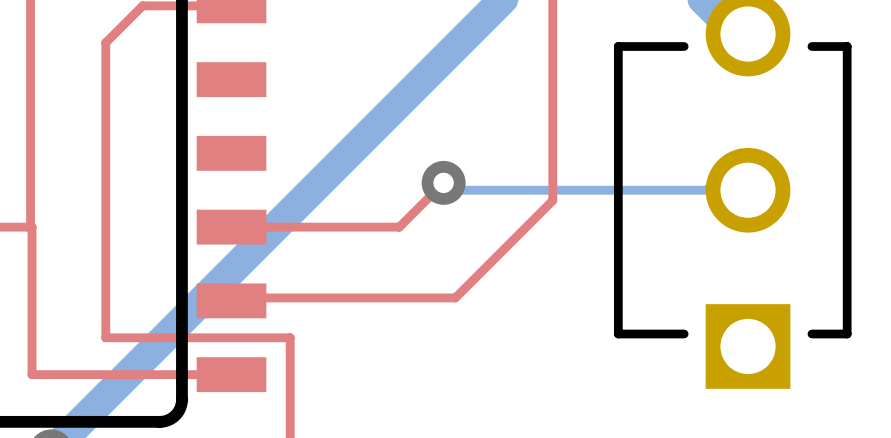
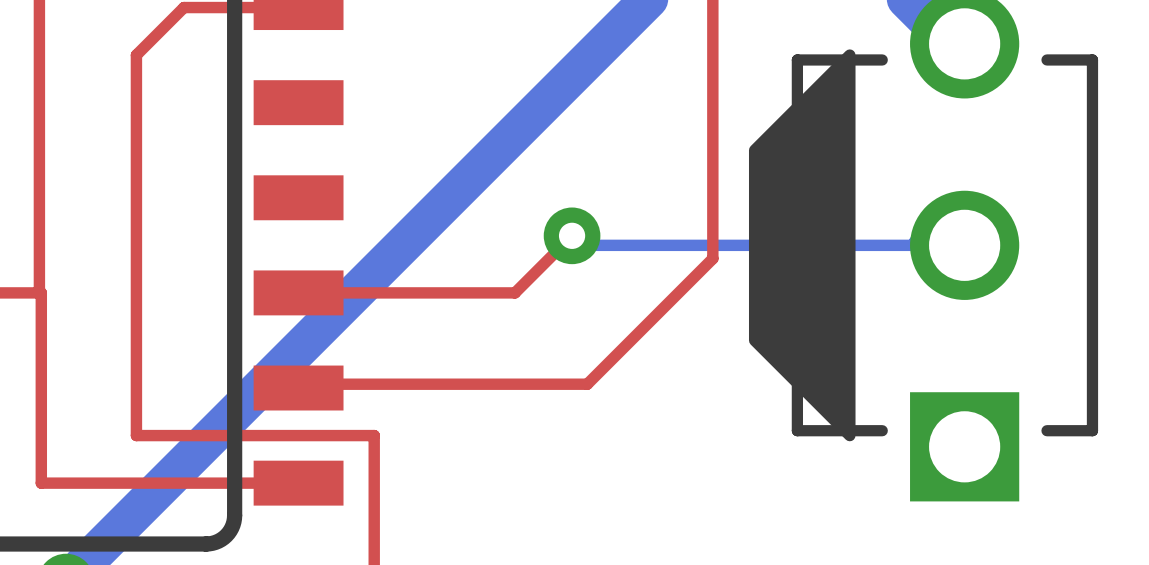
drawing: none -> [748, 49, 856, 442]

